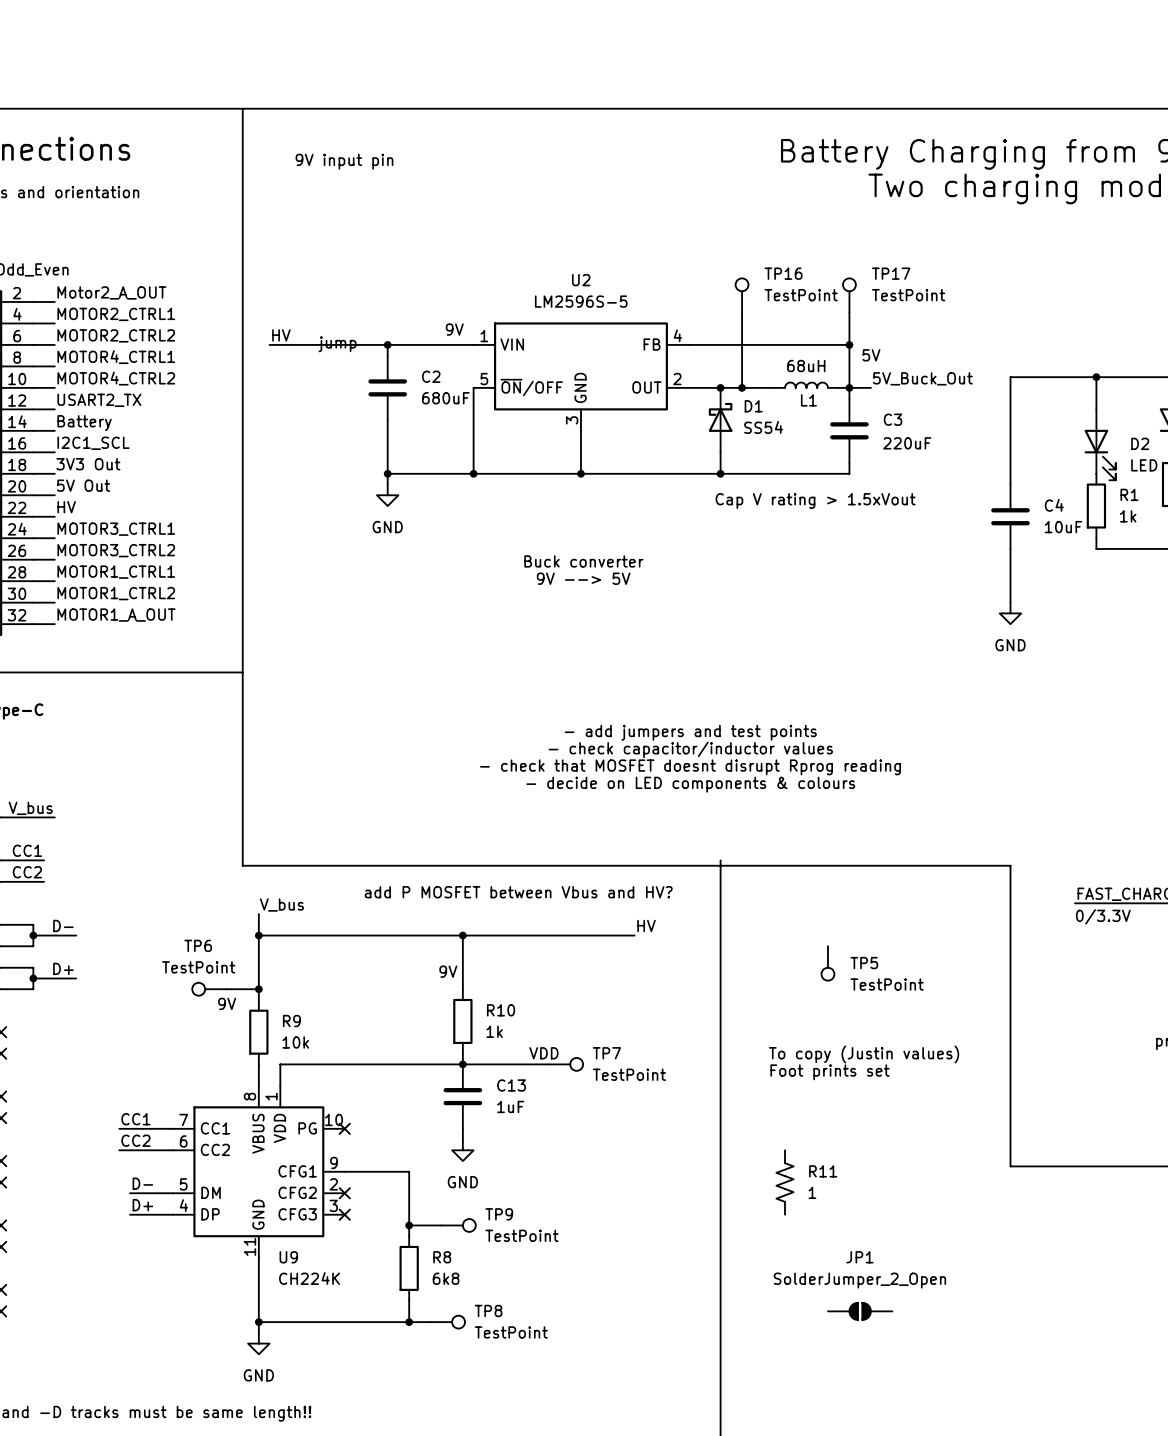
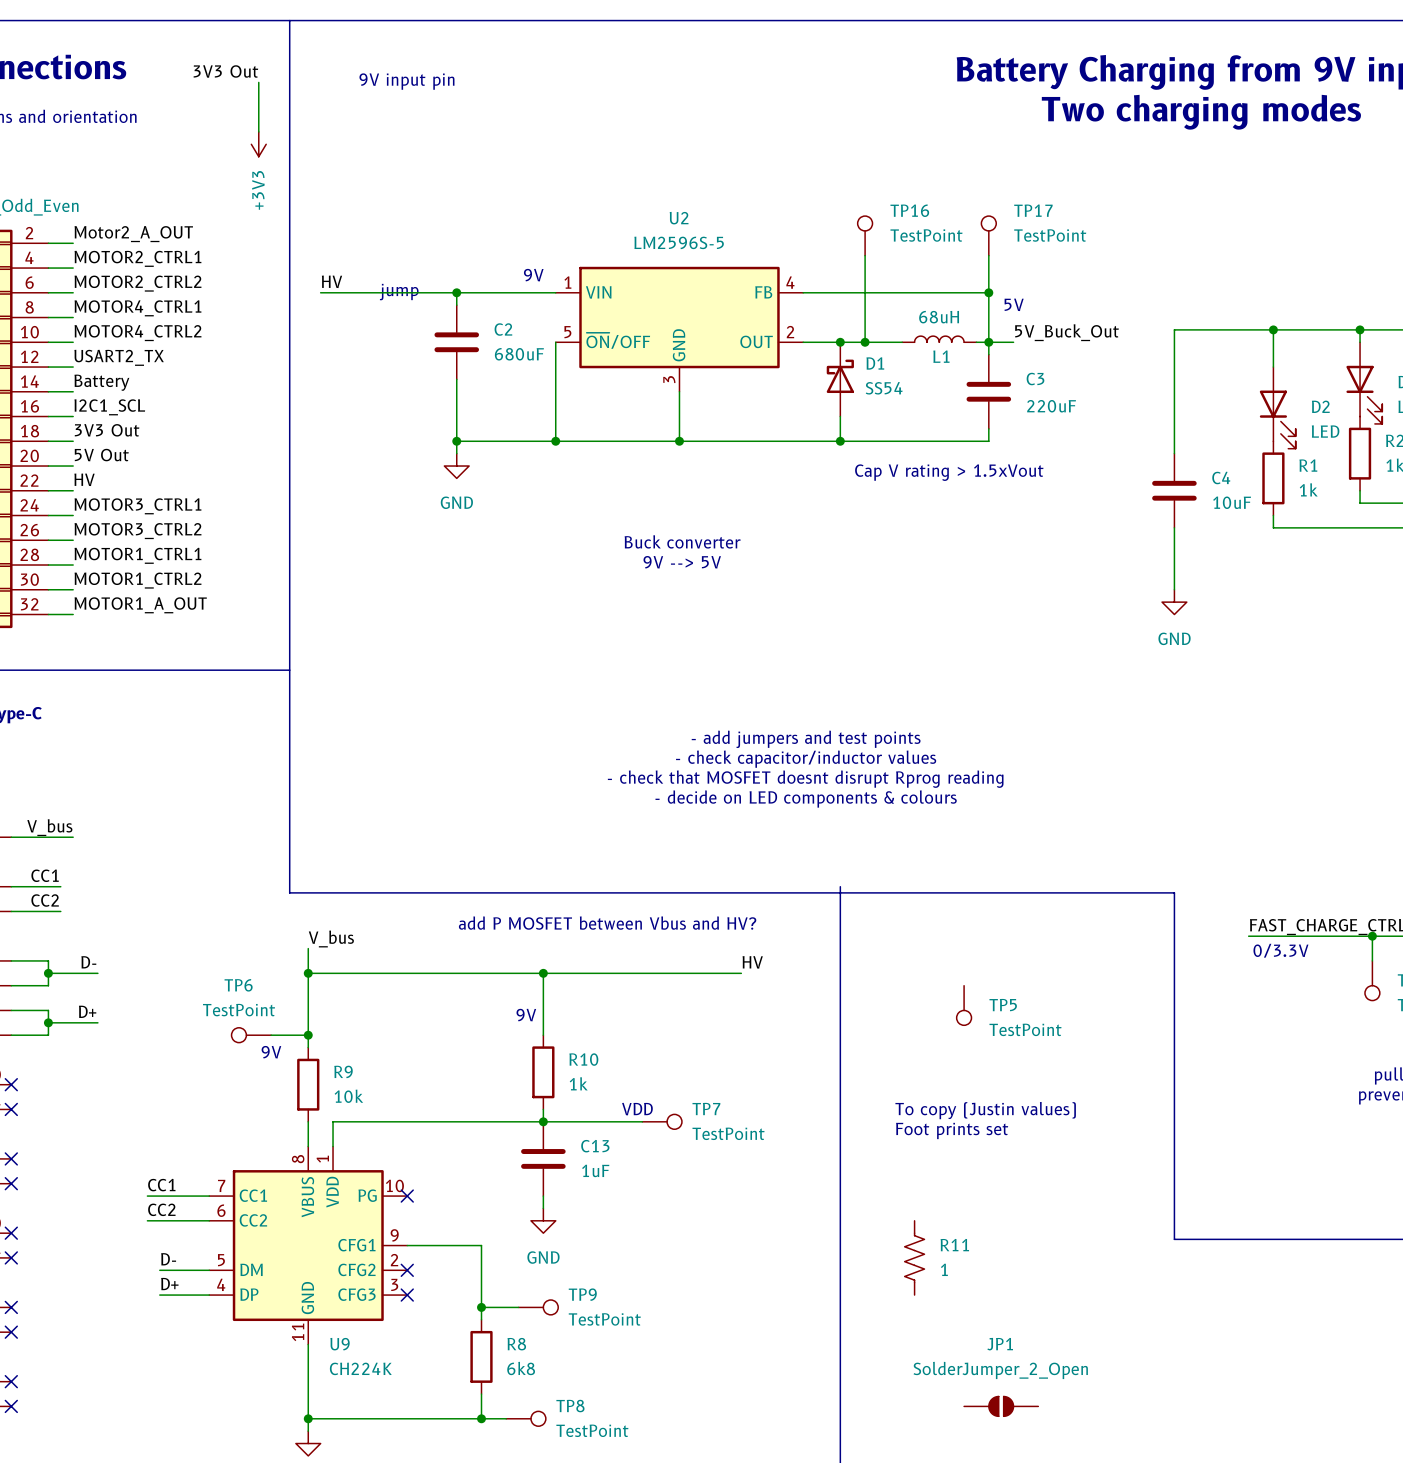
label: none -> 3V3 Out (225, 71)
wire: none -> (258, 82) (258, 131)
power symbol: none -> +3V3 (258, 144)

